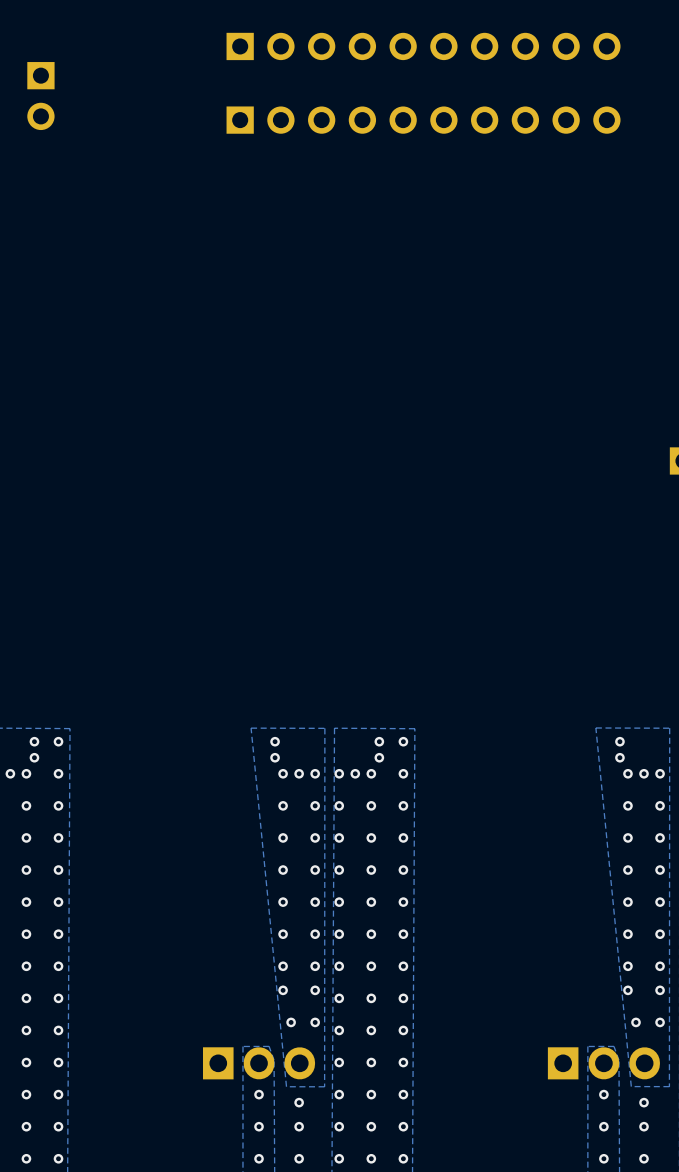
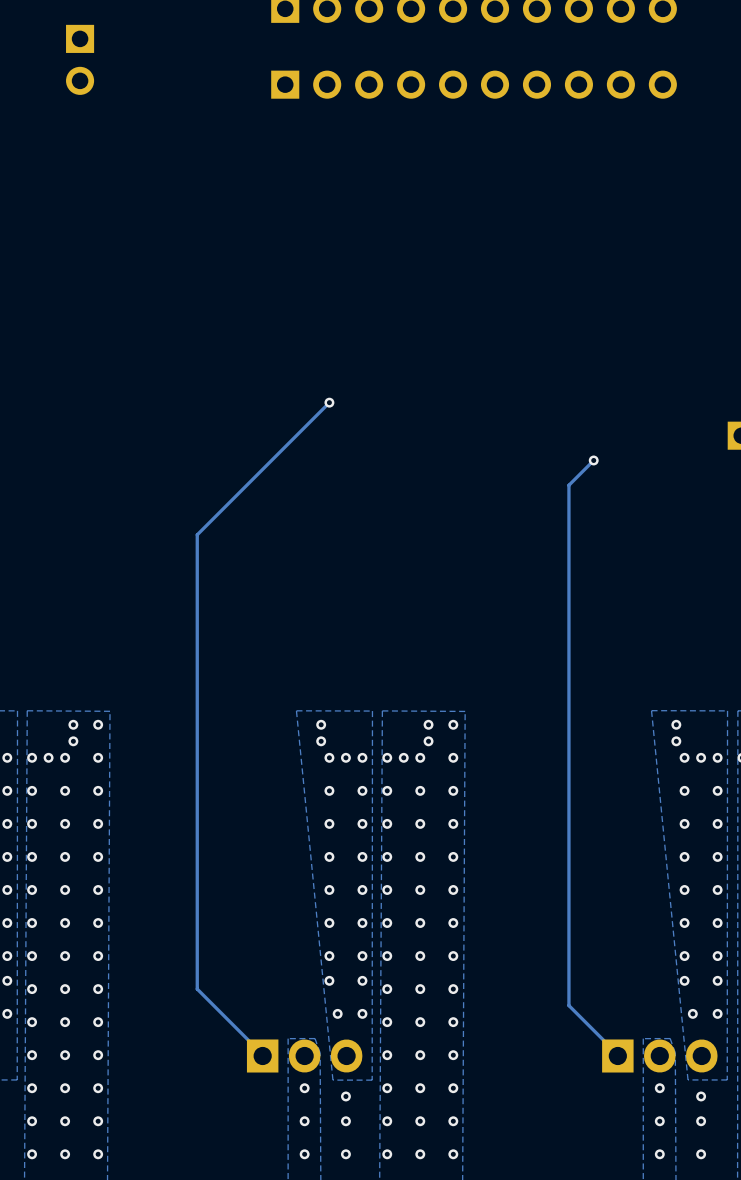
track: none -> (329, 402) (197, 534) (197, 989) (262, 1055)
via: none -> (329, 402)
track: none -> (593, 460) (568, 485) (568, 1005) (617, 1055)
via: none -> (593, 460)

